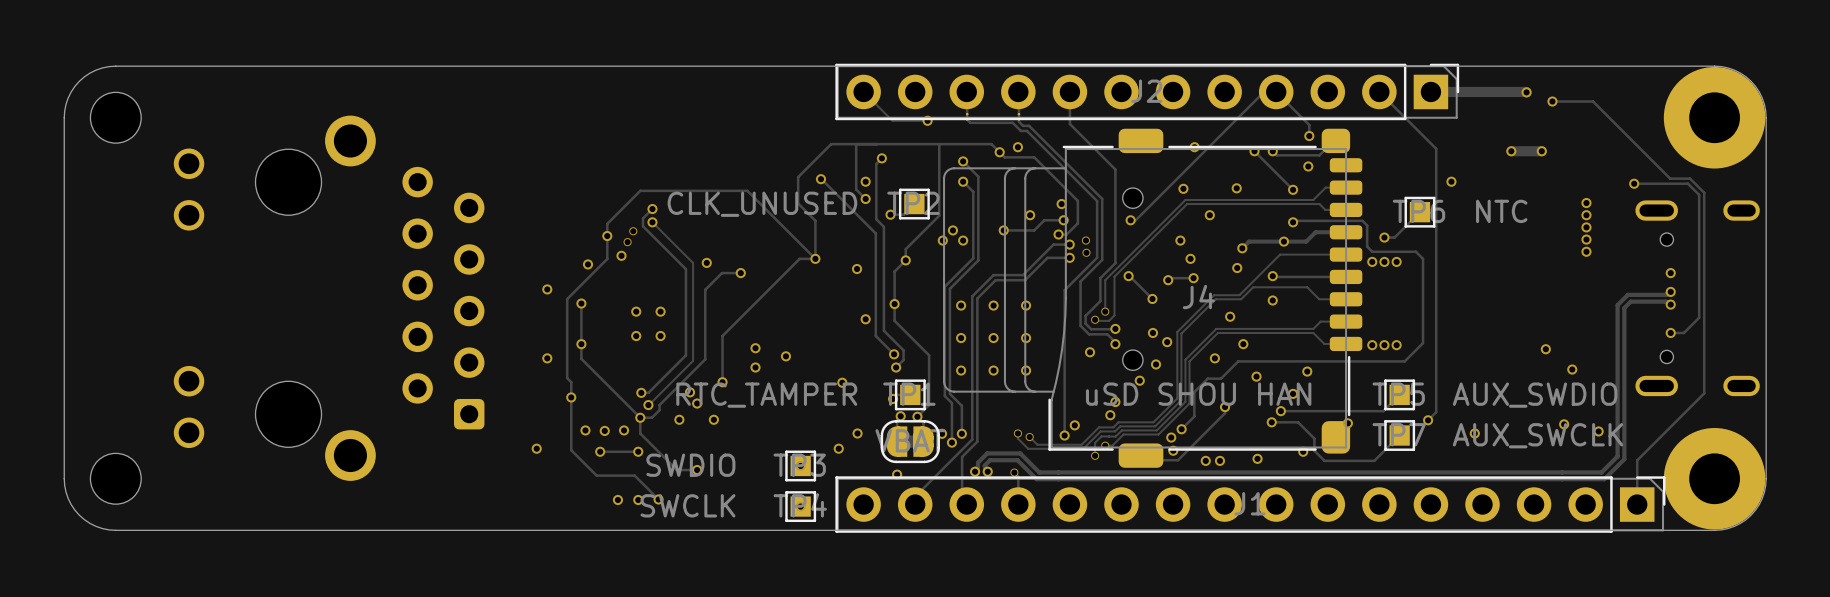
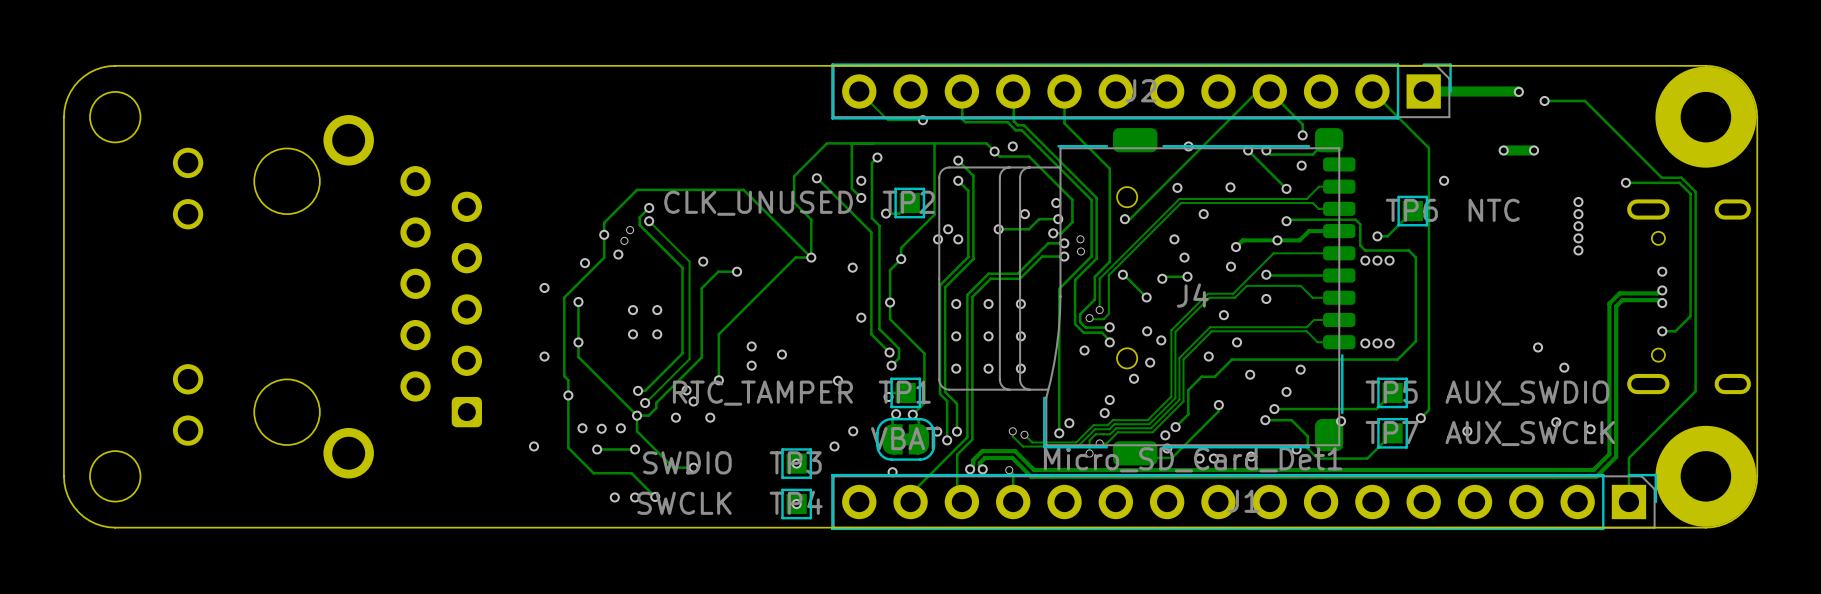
J4 value: uSD SHOU HAN (1198, 394) -> Micro_SD_Card_Det1 (1193, 459)

